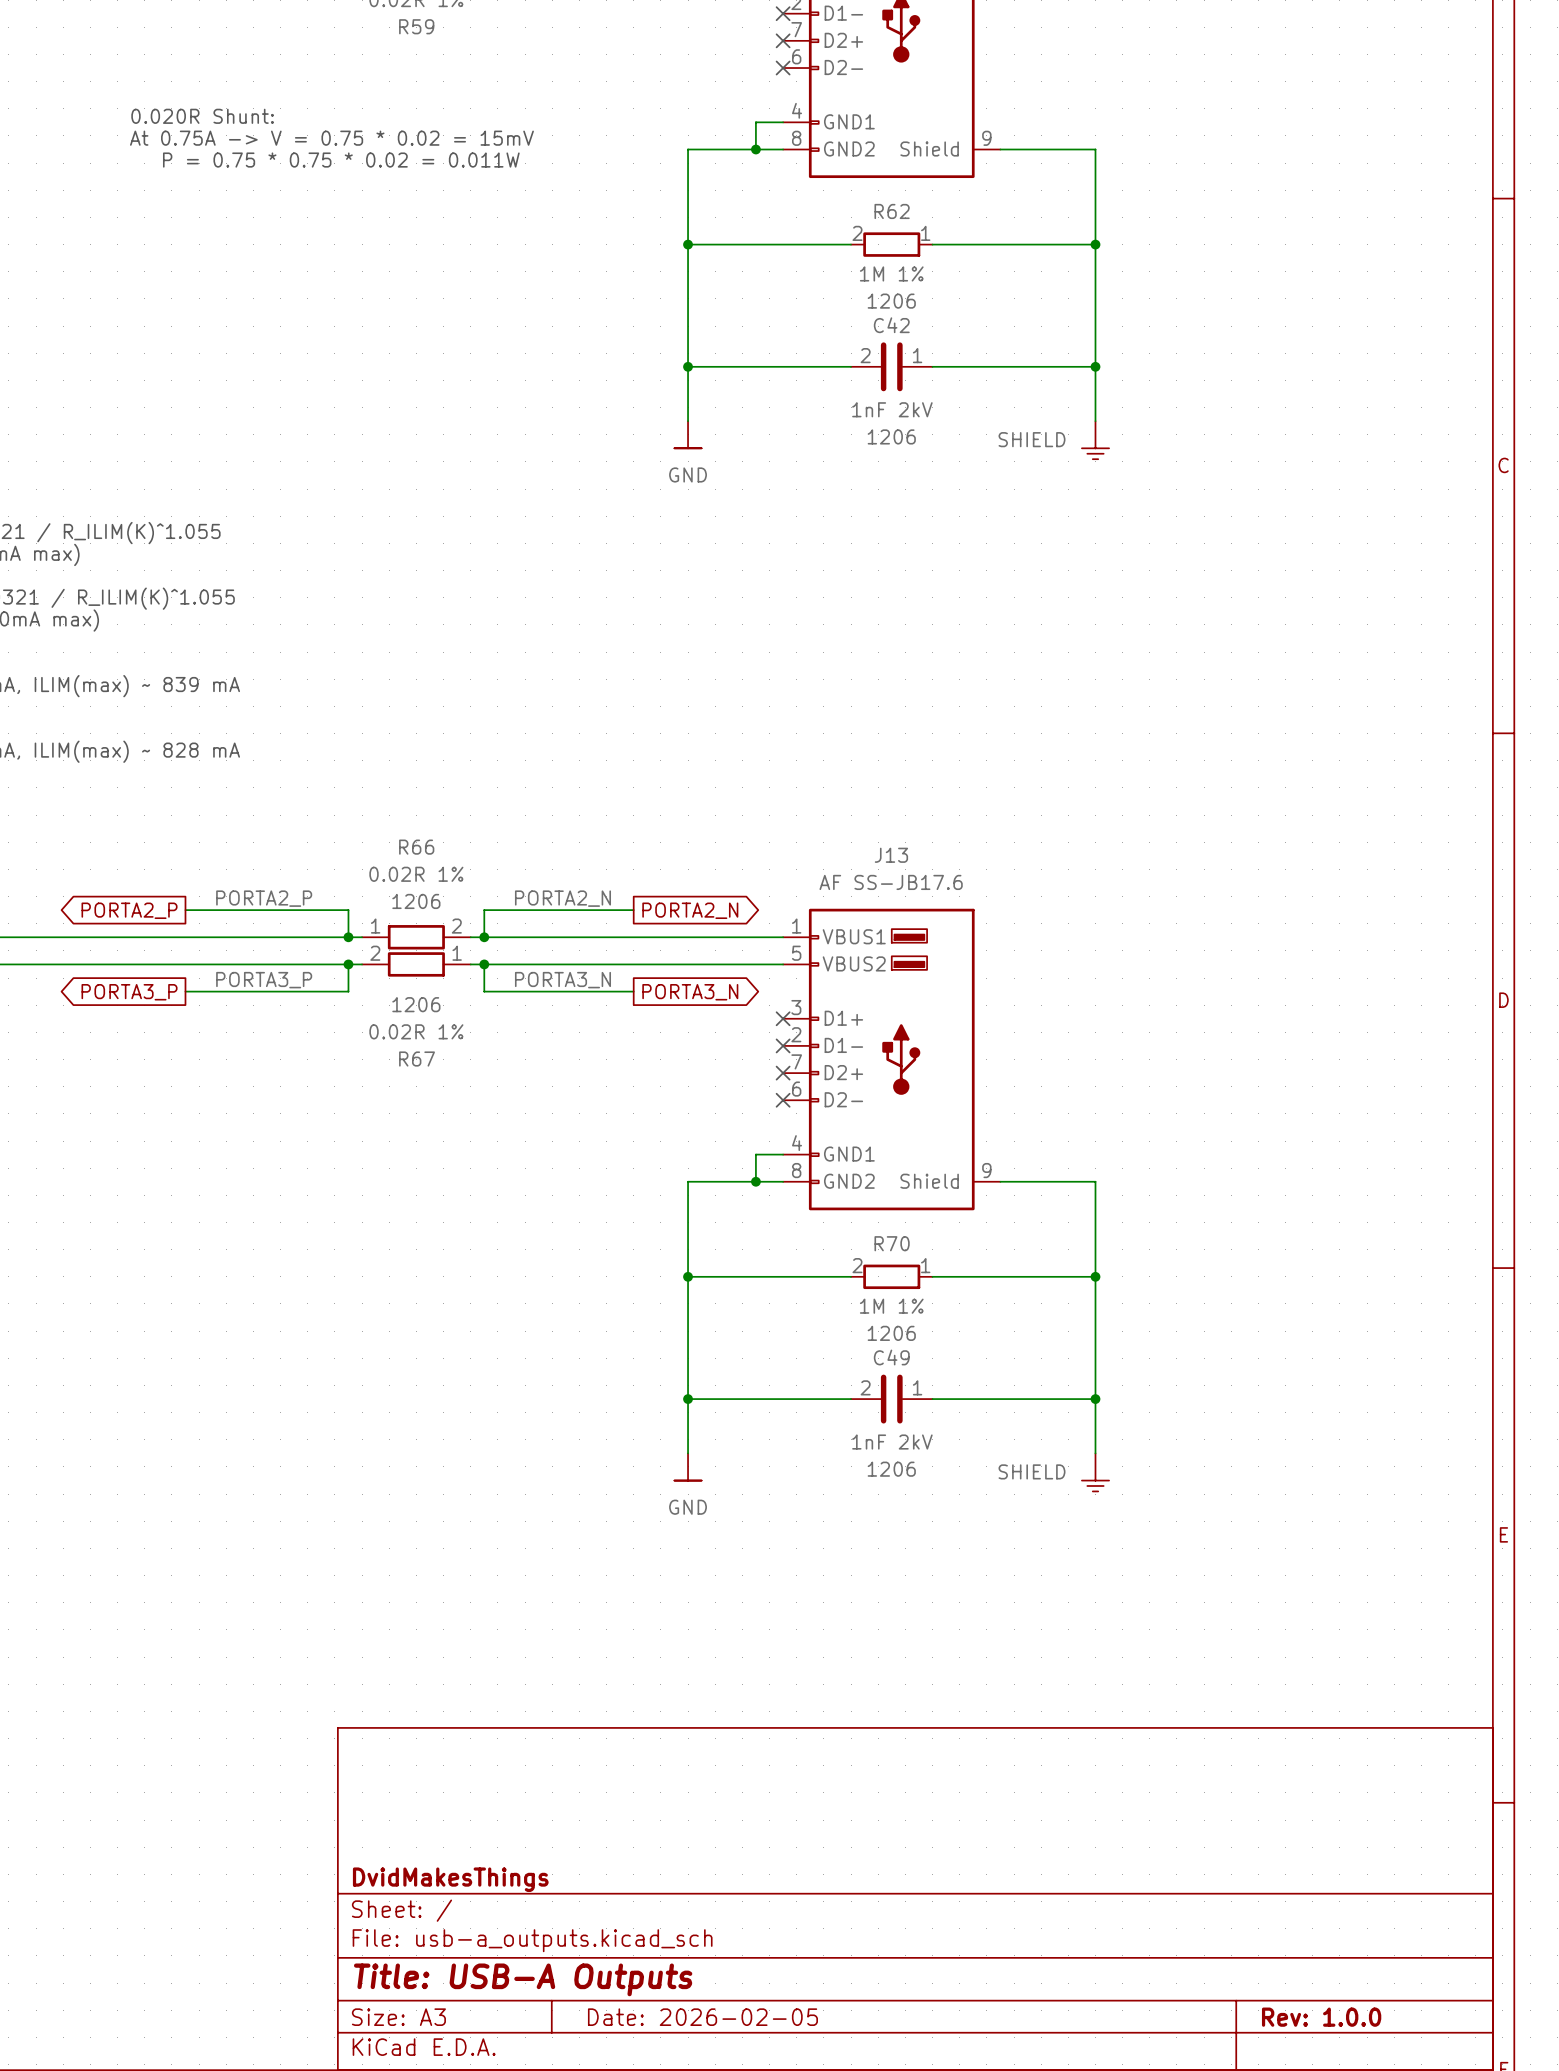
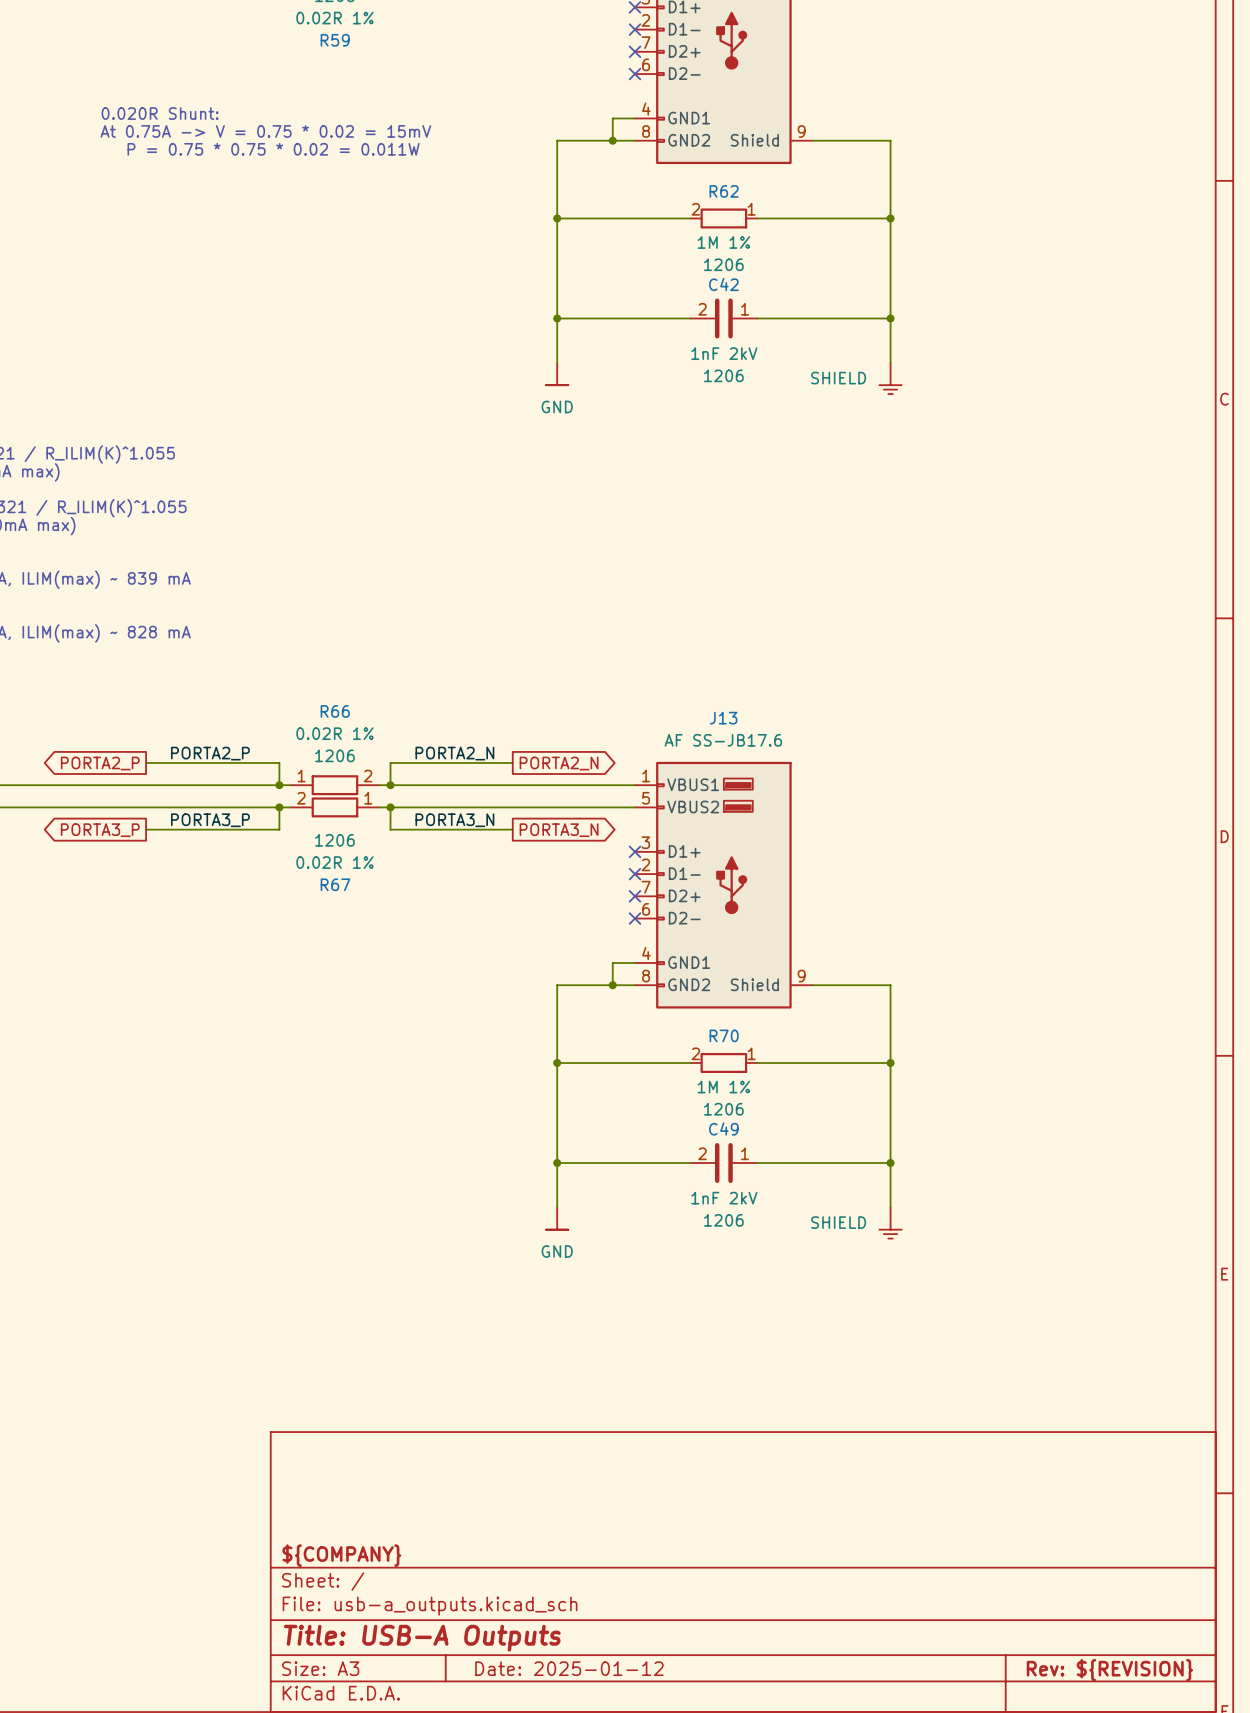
title block: DvidMakesThings (450, 1879) -> ${COMPANY} (341, 1555)
title block: Date: 2026-02-05 (702, 2017) -> Date: 2025-01-12 (569, 1668)
title block: Rev: 1.0.0 (1321, 2017) -> Rev: ${REVISION} (1109, 1670)

